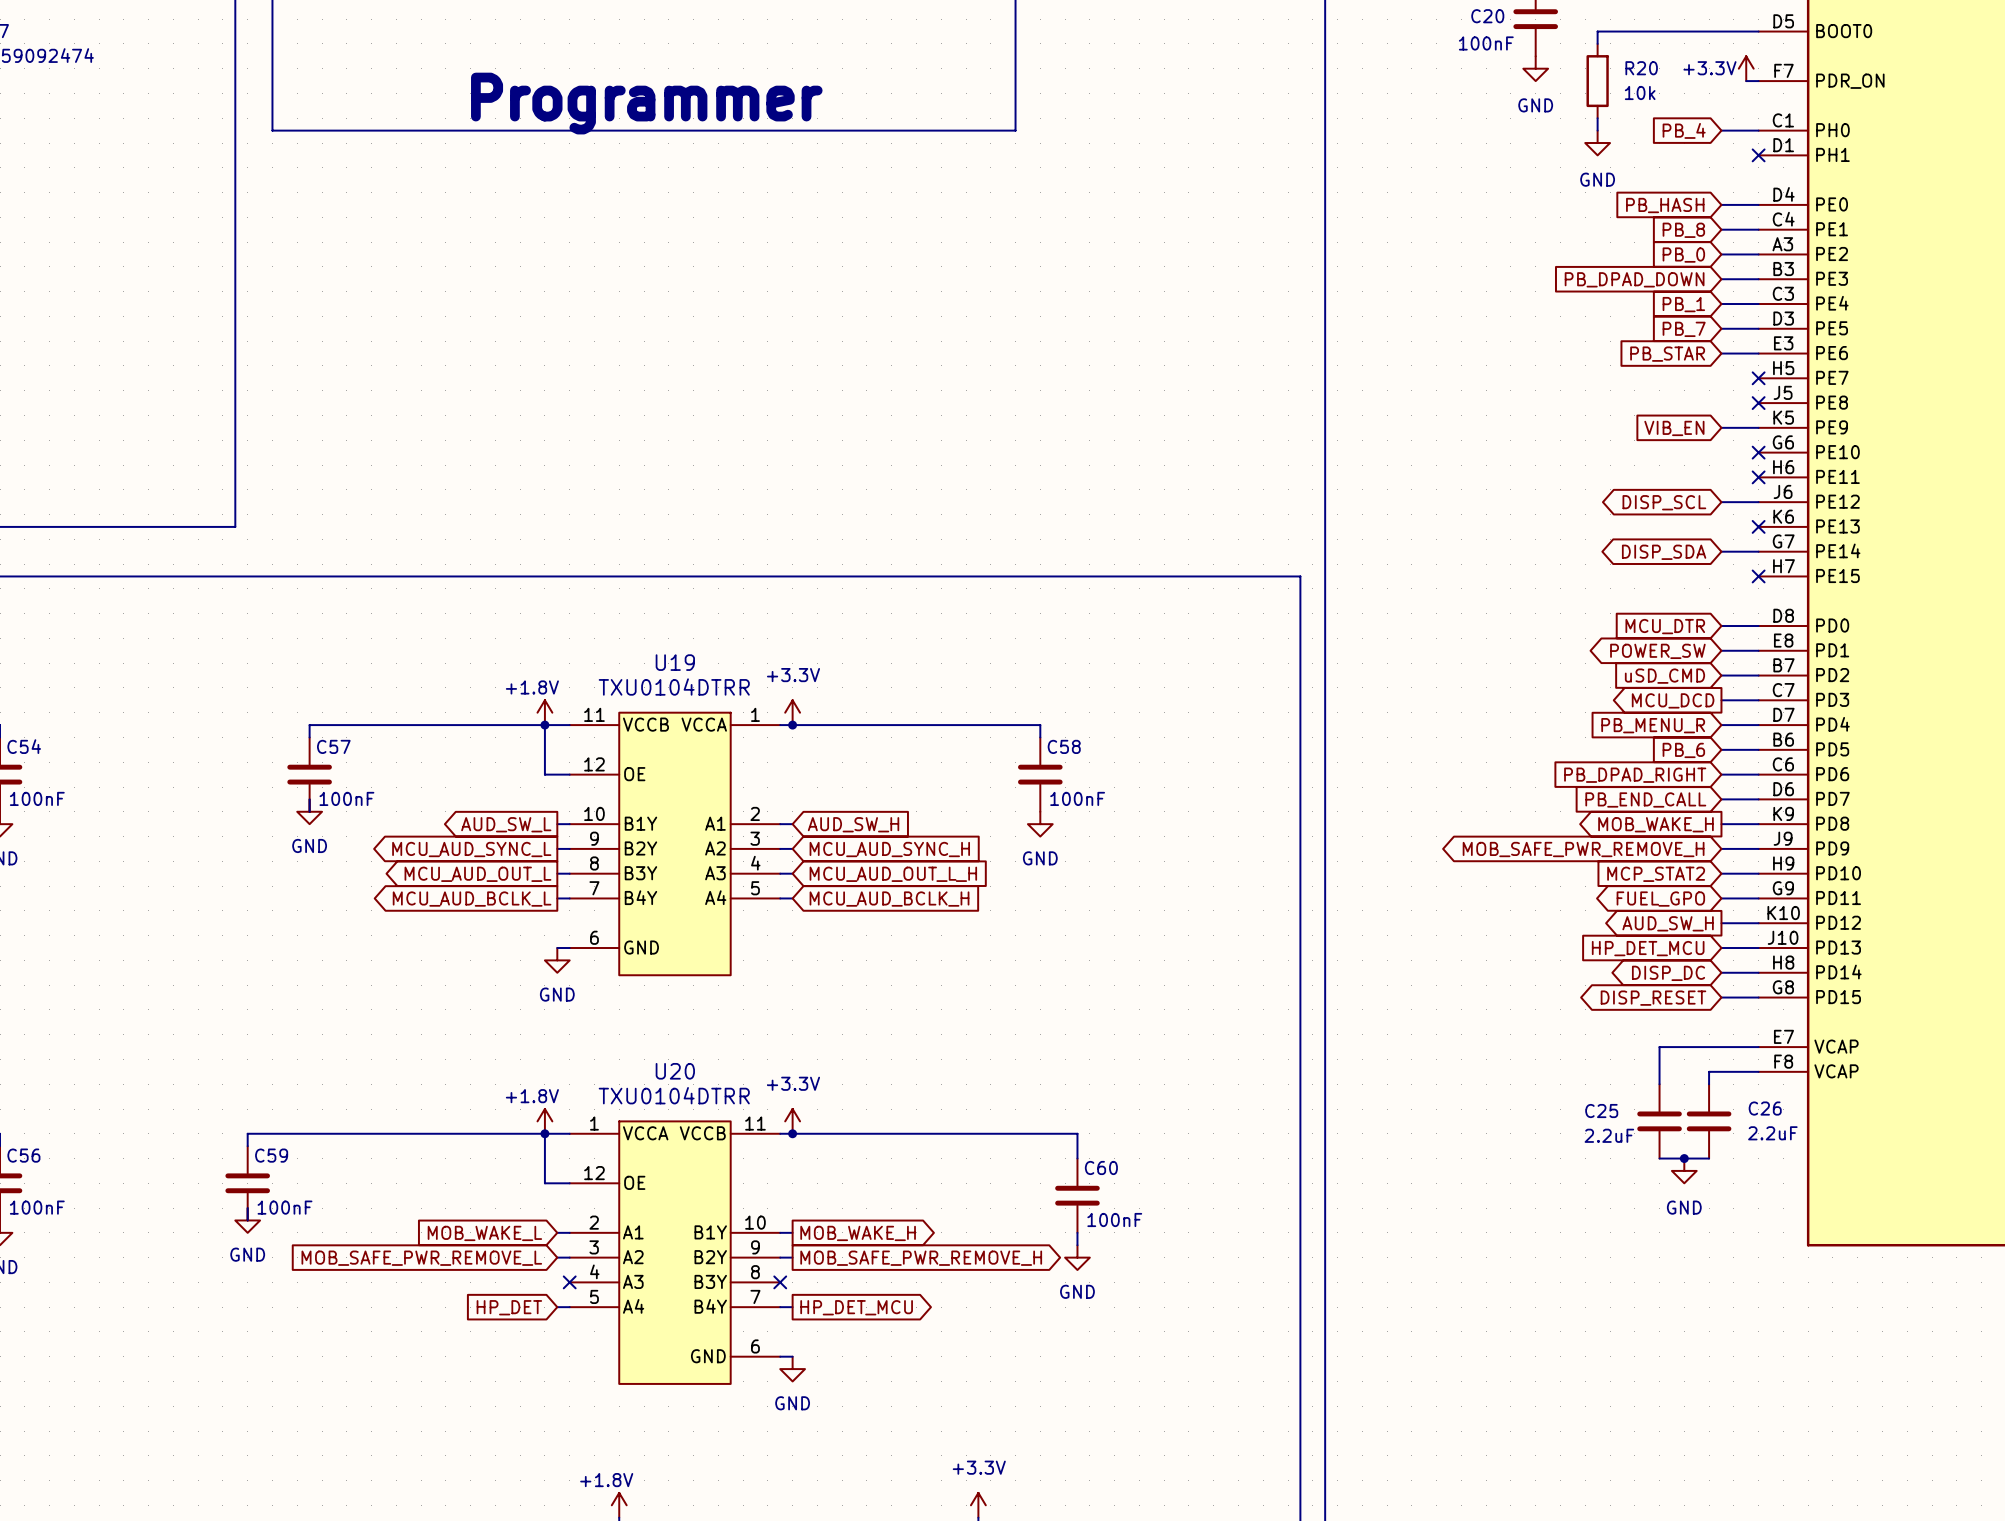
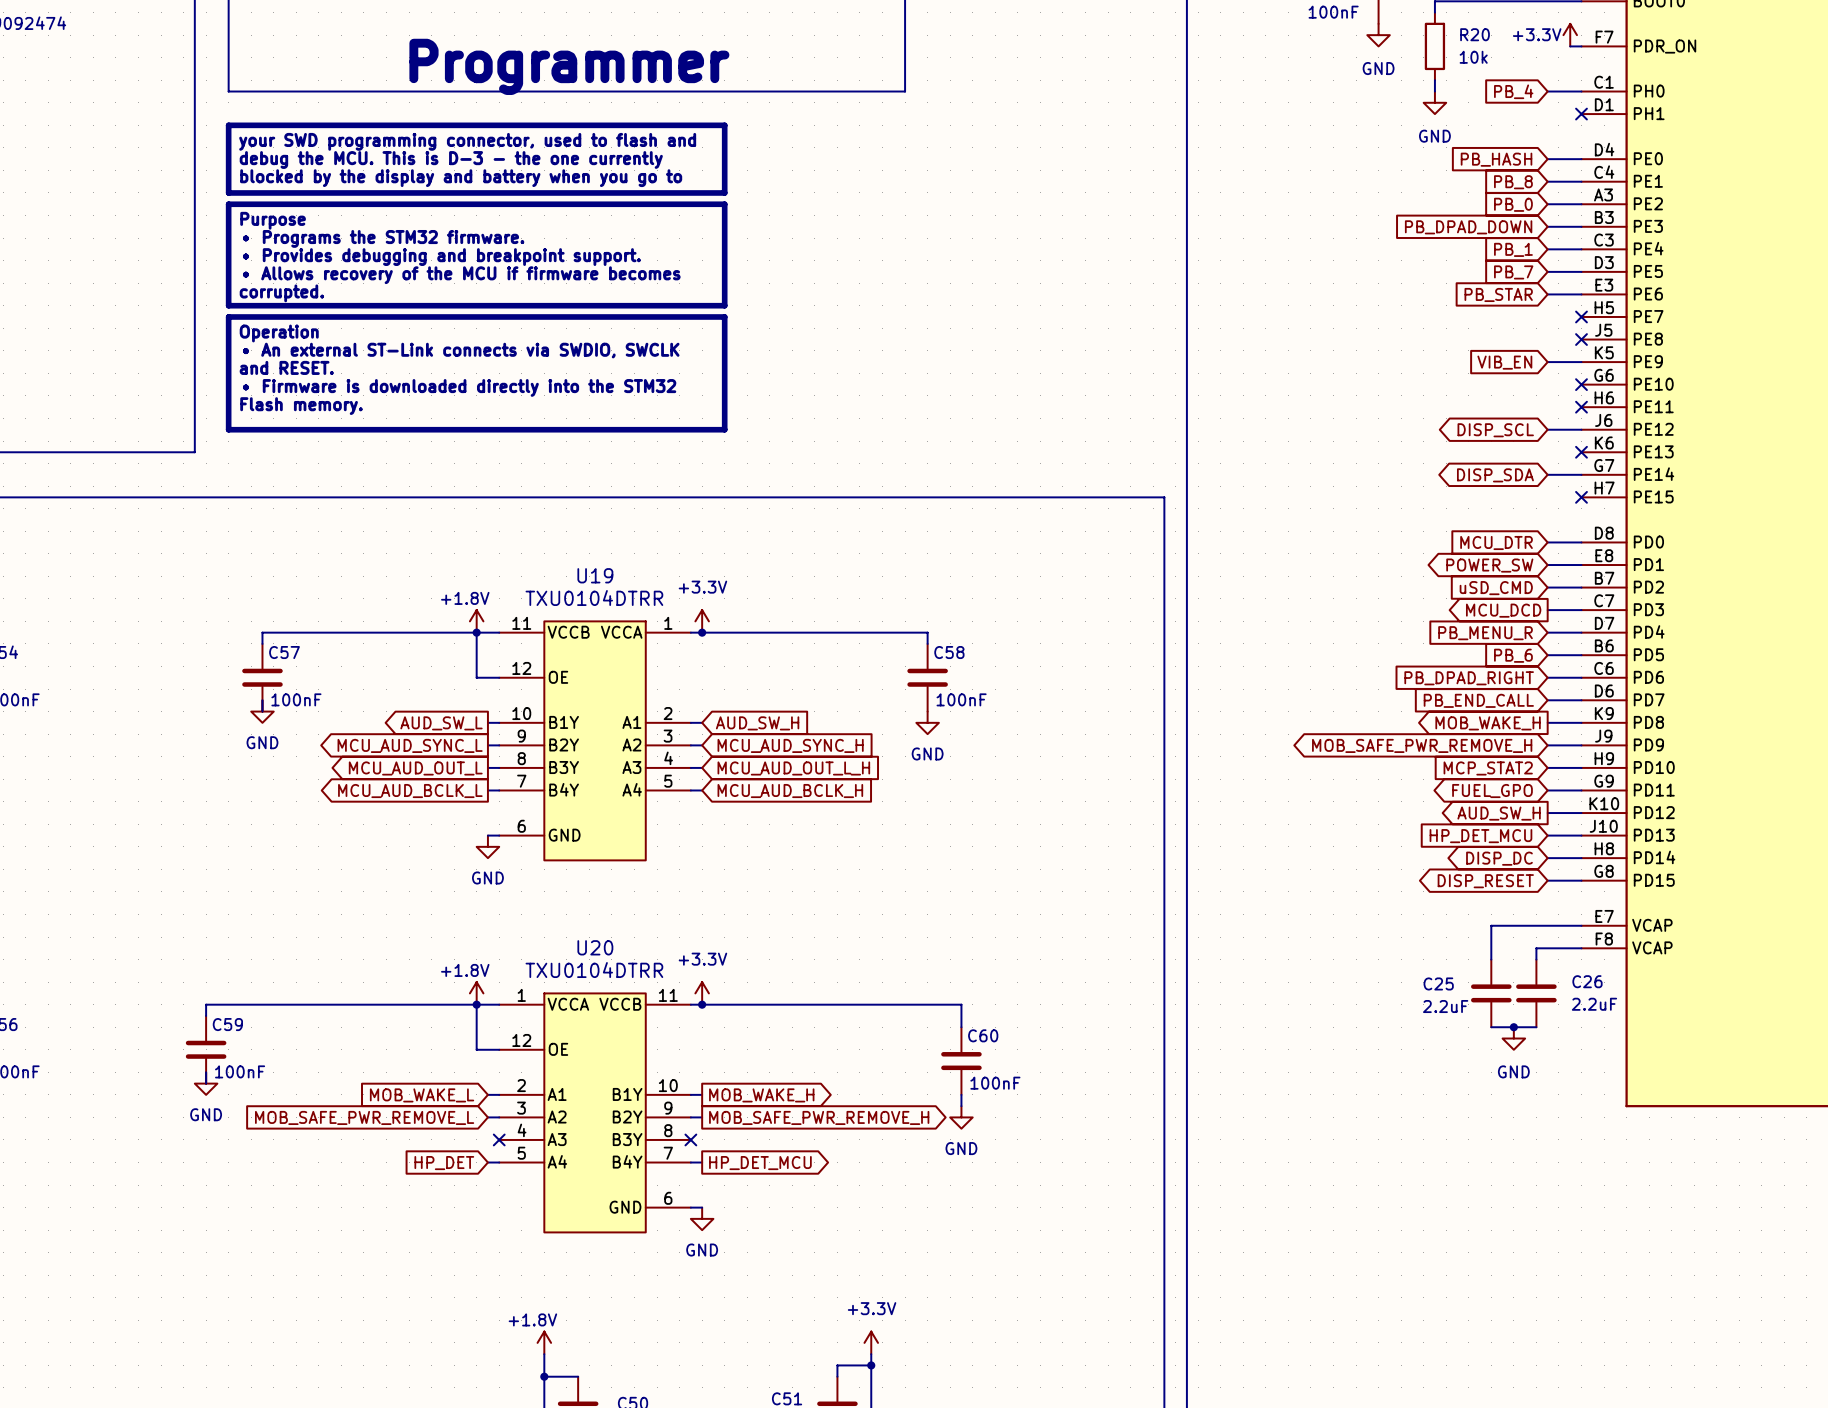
line: none -> (228, 125) (724, 125) (724, 192) (228, 192) (228, 125)
text: none -> your SWD programming connector, used to flash and (467, 141)
text: none -> debug the MCU. This is D-3 - the one currently (451, 159)
text: none -> blocked by the display and battery when you go to (461, 178)
line: none -> (228, 204) (228, 305) (724, 305) (724, 204) (228, 204)
text: none -> Purpose (273, 220)
text: none -> • Programs the STM32 firmware. (383, 238)
text: none -> • Provides debugging and breakpoint support. (441, 257)
text: none -> • Allows recovery of the MCU if firmware becomes (461, 275)
text: none -> corrupted. (281, 293)
line: none -> (228, 316) (228, 429) (724, 429) (724, 316) (228, 316)
text: none -> Operation (279, 333)
text: none -> • An external ST-Link connects via SWDIO, SWCLK (461, 350)
text: none -> and RESET. (286, 367)
text: none -> • Firmware is downloaded directly into the STM32 (459, 387)
text: none -> Flash memory. (301, 406)

